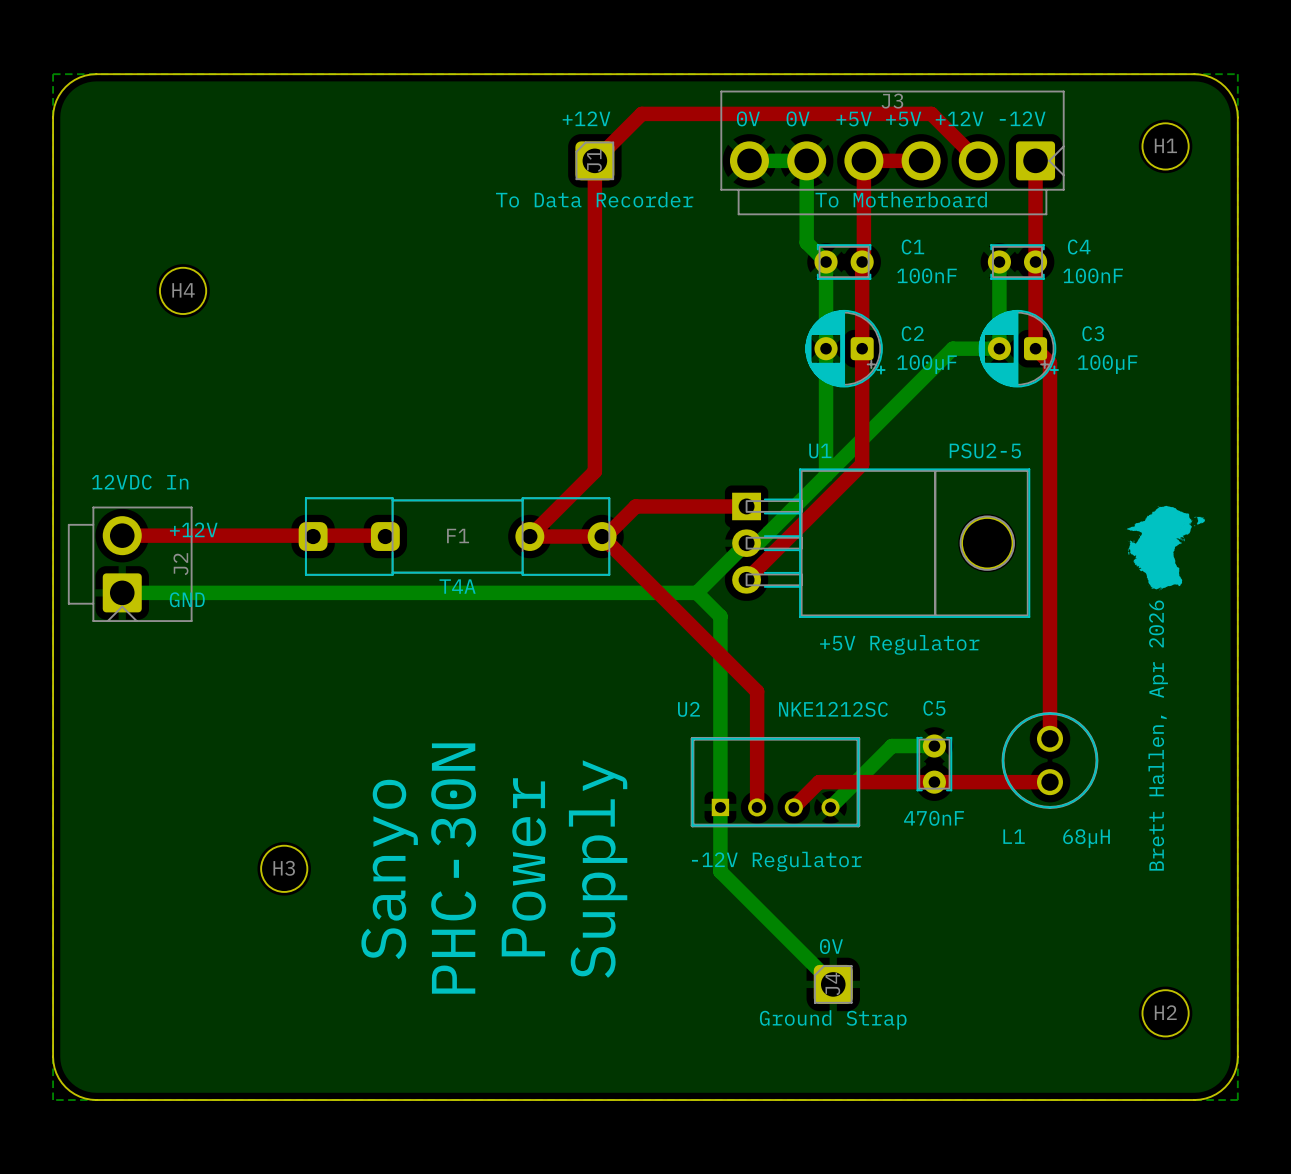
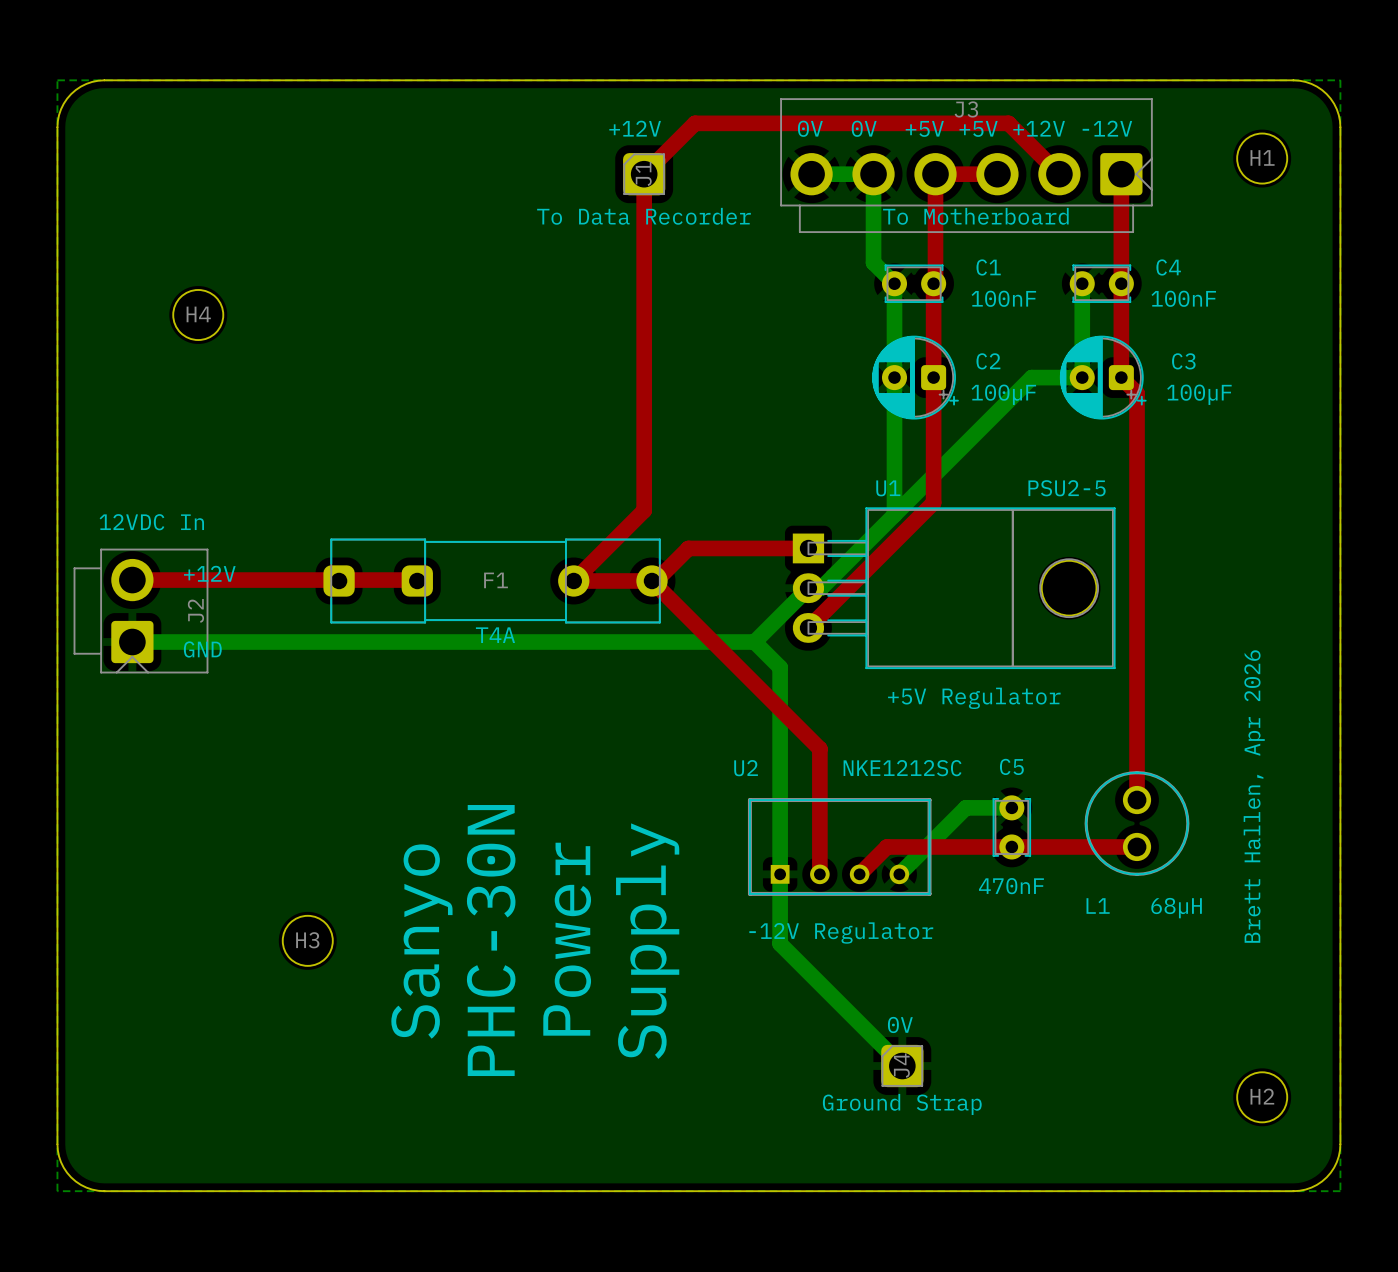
drawing: [1125, 505, 1206, 591] -> none

